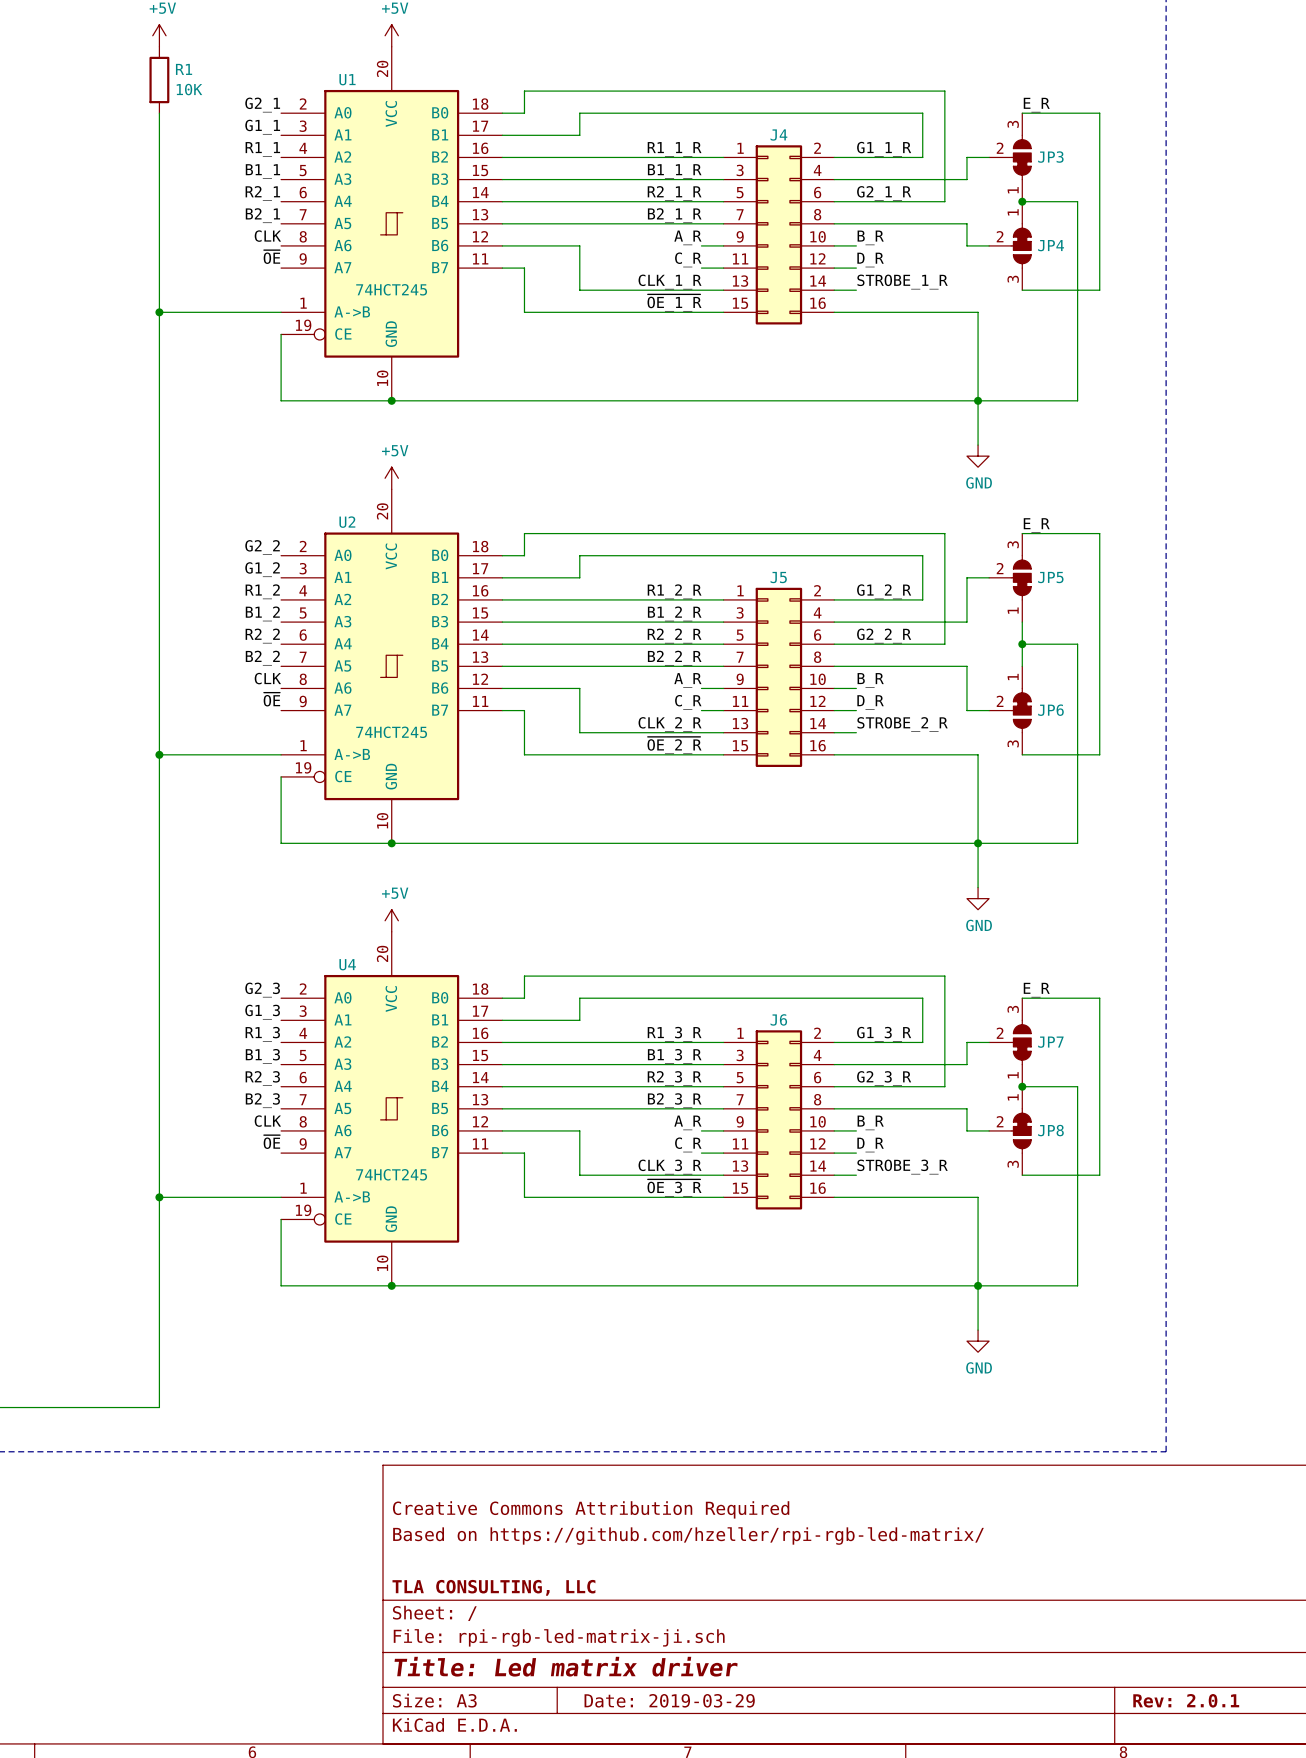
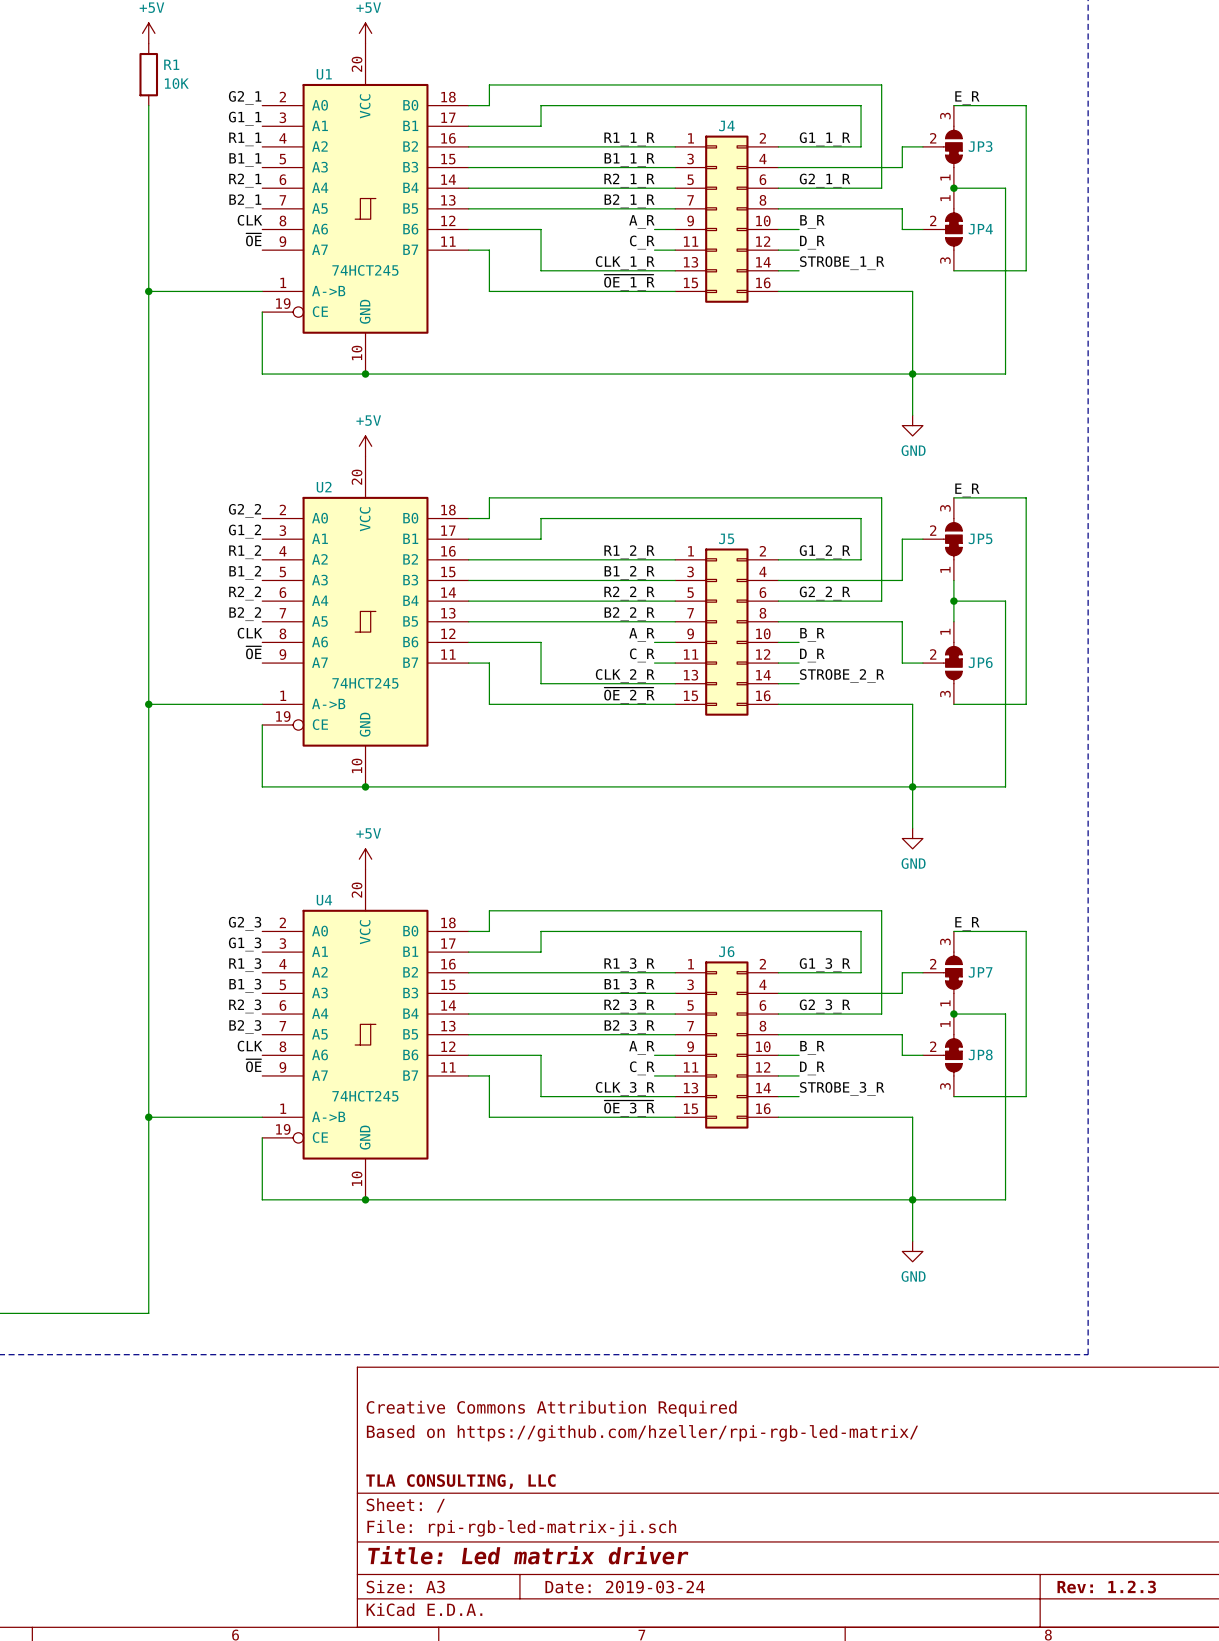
title block: Date: 2019-03-29 (669, 1700) -> Date: 2019-03-24 (625, 1587)
title block: Rev: 2.0.1 (1186, 1700) -> Rev: 1.2.3 (1106, 1587)

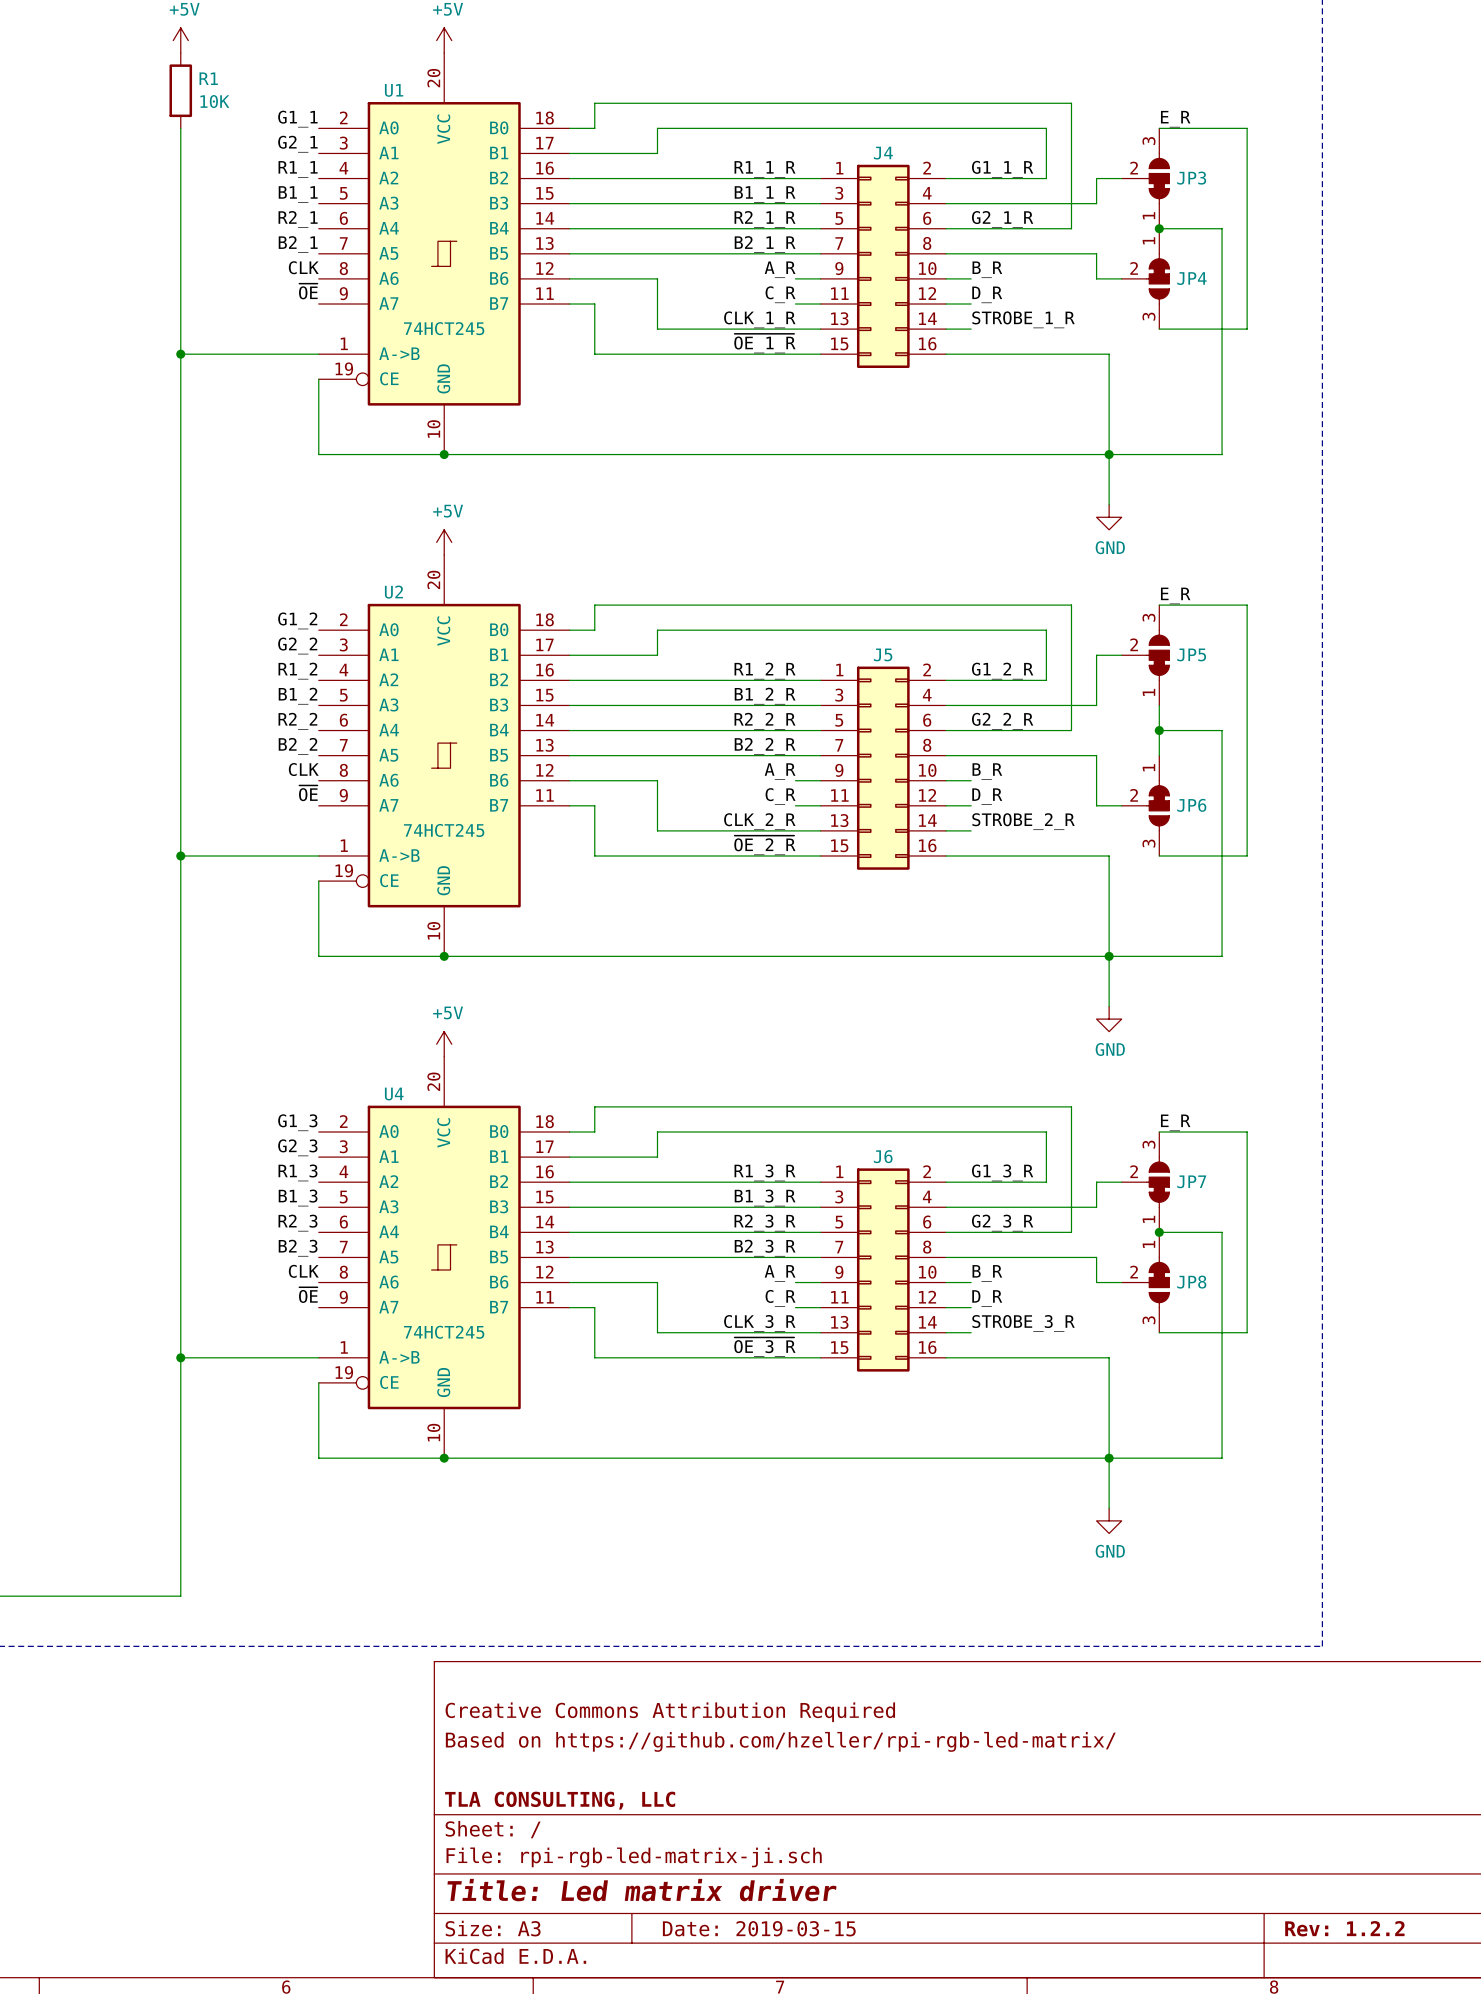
label: G2_1 (245, 97) -> G1_1 (297, 119)
label: G1_1 (245, 118) -> G2_1 (297, 144)
label: G2_2 (244, 510) -> G1_2 (297, 620)
label: G1_2 (244, 531) -> G2_2 (297, 645)
label: G2_3 (245, 923) -> G1_3 (297, 1122)
label: G1_3 (245, 944) -> G2_3 (297, 1147)
title block: Date: 2019-03-24 (625, 1587) -> Date: 2019-03-15 (759, 1928)
title block: Rev: 1.2.3 (1106, 1587) -> Rev: 1.2.2 (1344, 1928)

